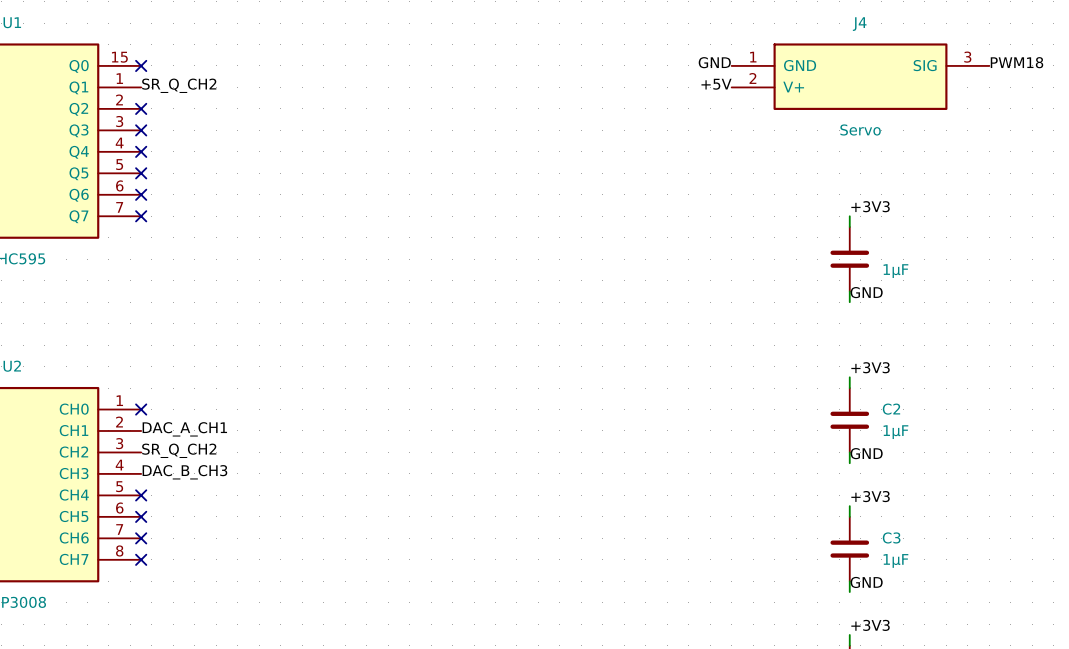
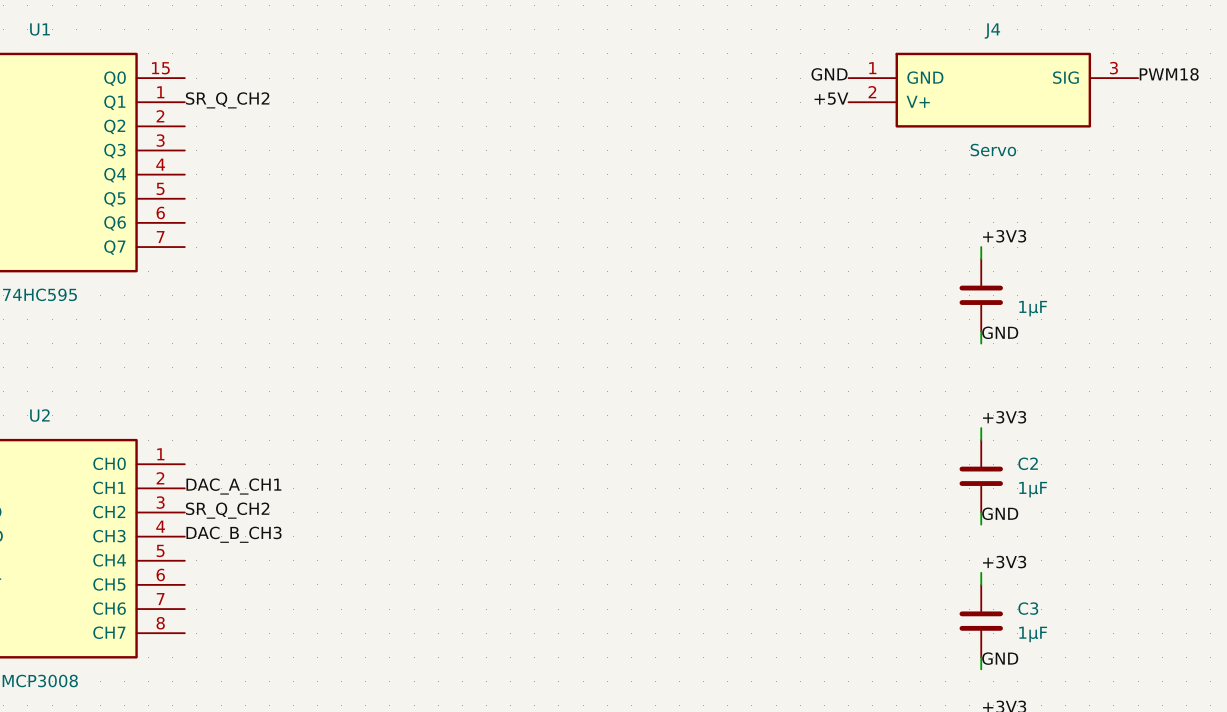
no-connect mark: (141, 65) -> none
no-connect mark: (141, 108) -> none
no-connect mark: (141, 130) -> none
no-connect mark: (141, 151) -> none
no-connect mark: (141, 173) -> none
no-connect mark: (141, 194) -> none
no-connect mark: (141, 216) -> none
no-connect mark: (141, 409) -> none
no-connect mark: (141, 495) -> none
no-connect mark: (141, 516) -> none
no-connect mark: (141, 538) -> none
no-connect mark: (141, 559) -> none

